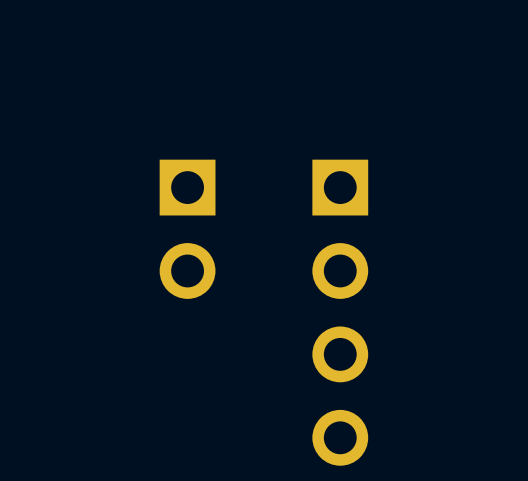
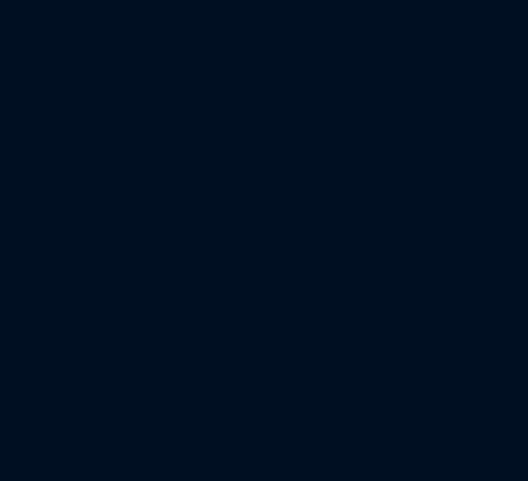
part: (187, 229) -> none
part: (340, 312) -> none

